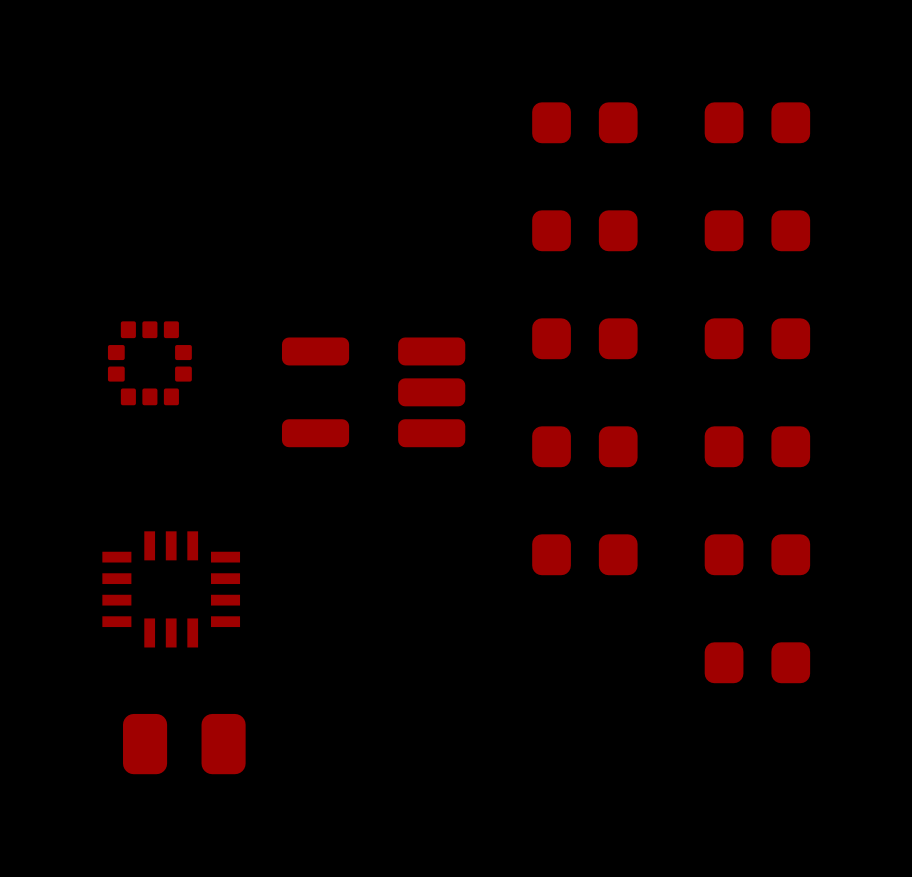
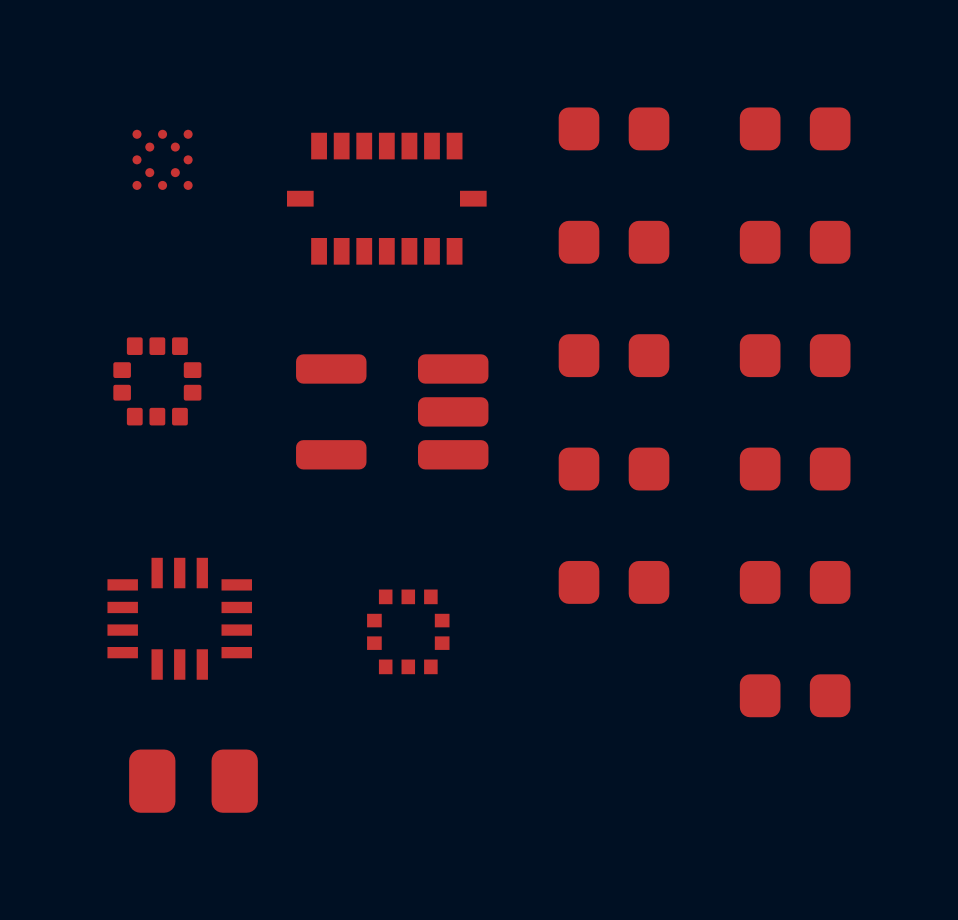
part: none -> (162, 159)
part: none -> (386, 198)
part: none -> (408, 631)

